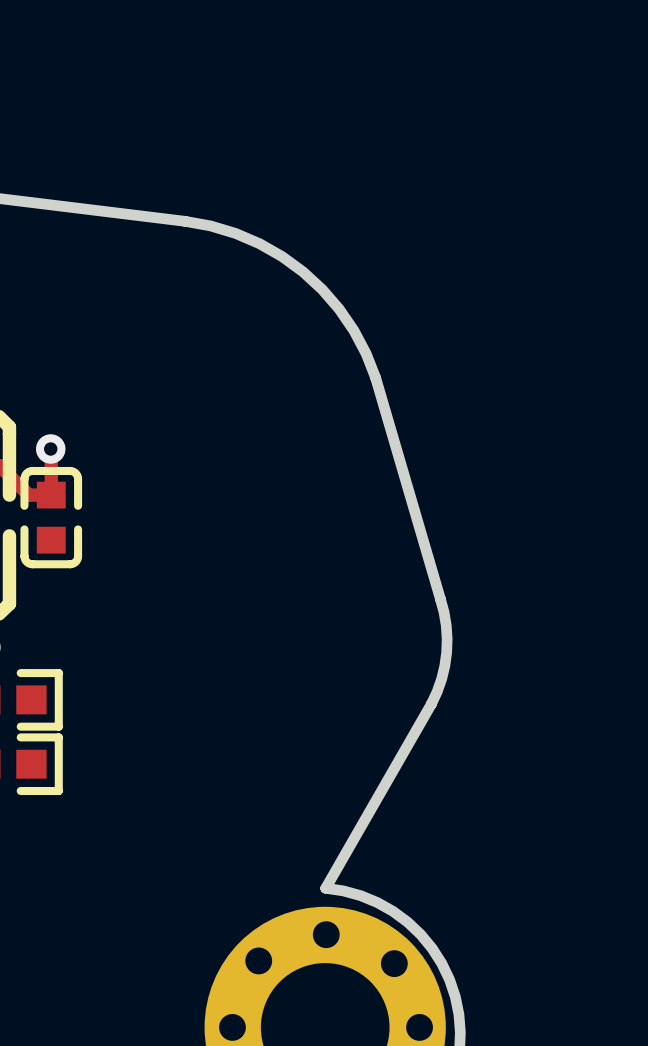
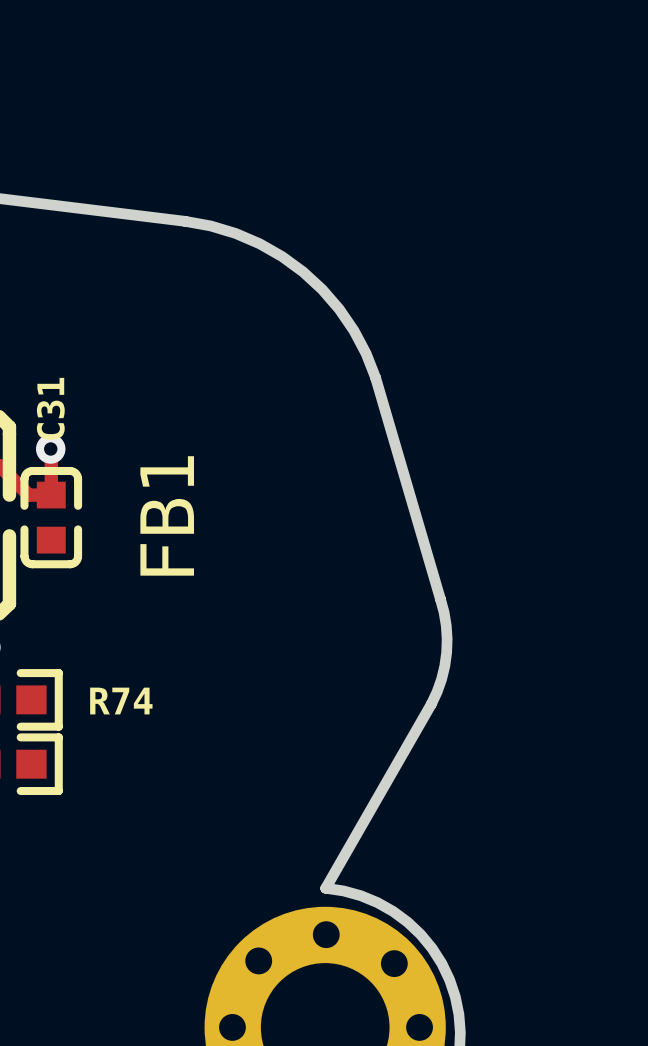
C31 name: none -> C31 (50, 408)
FB1 name: none -> FB1 (167, 515)
R74 name: none -> R74 (121, 701)

